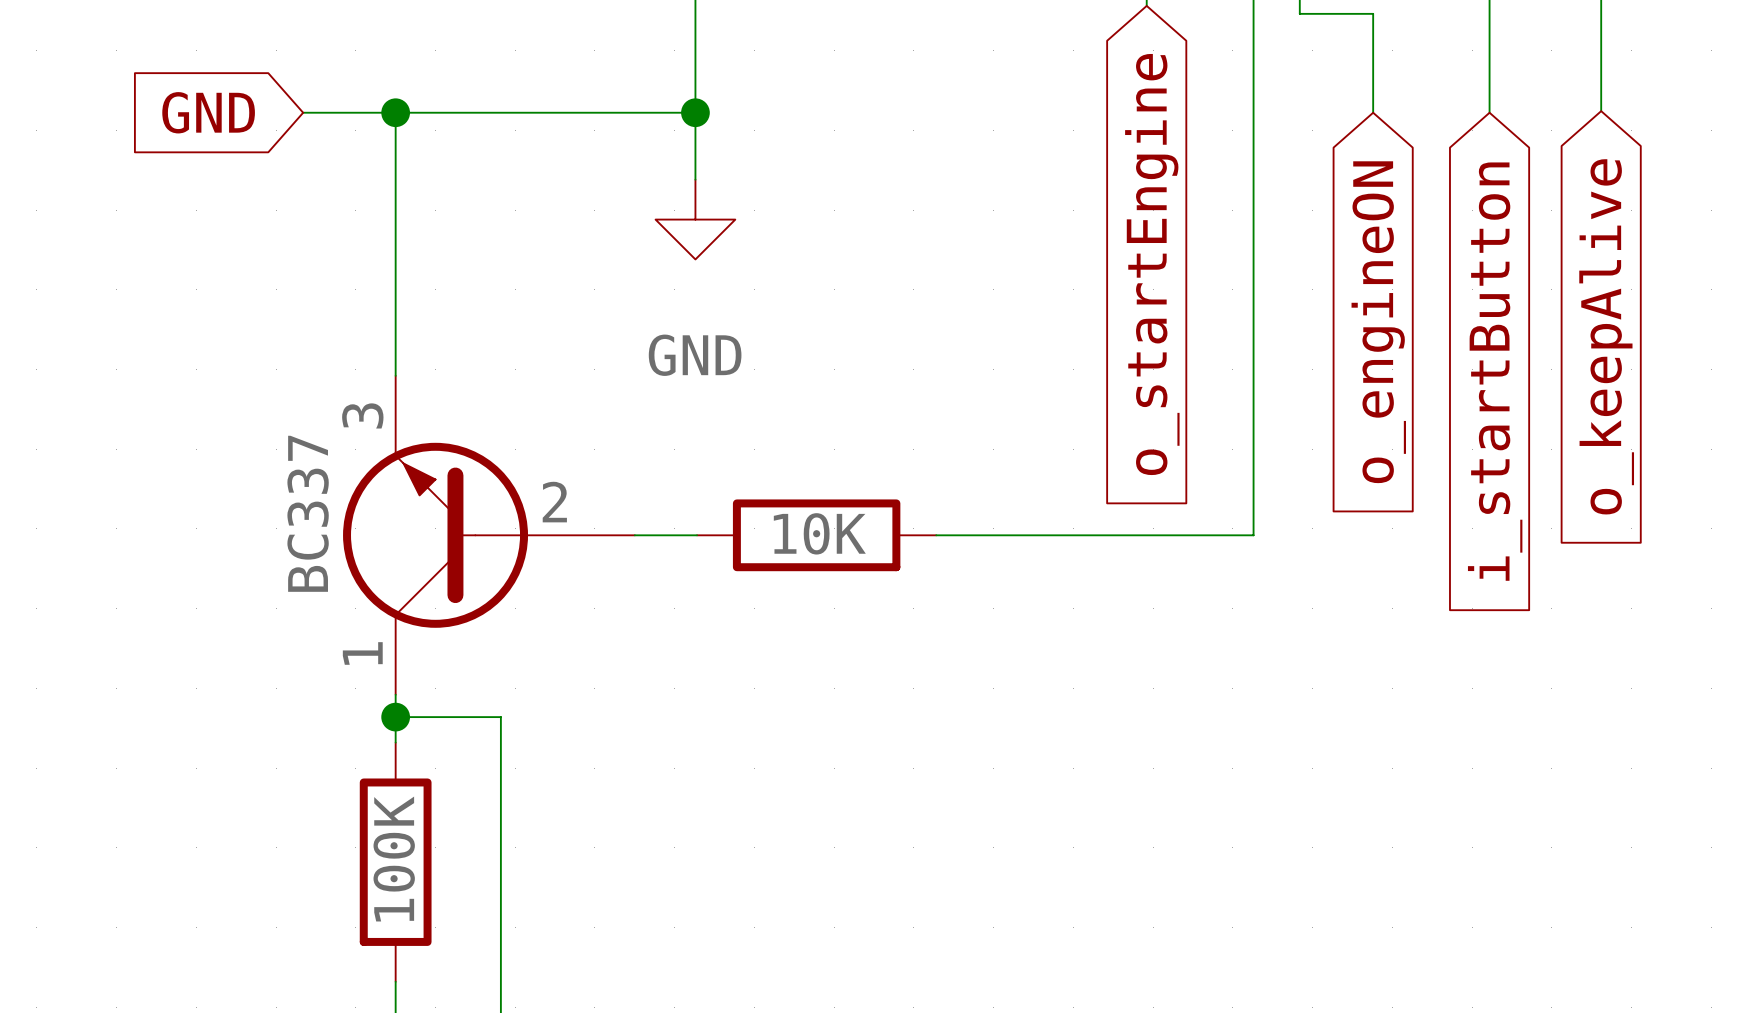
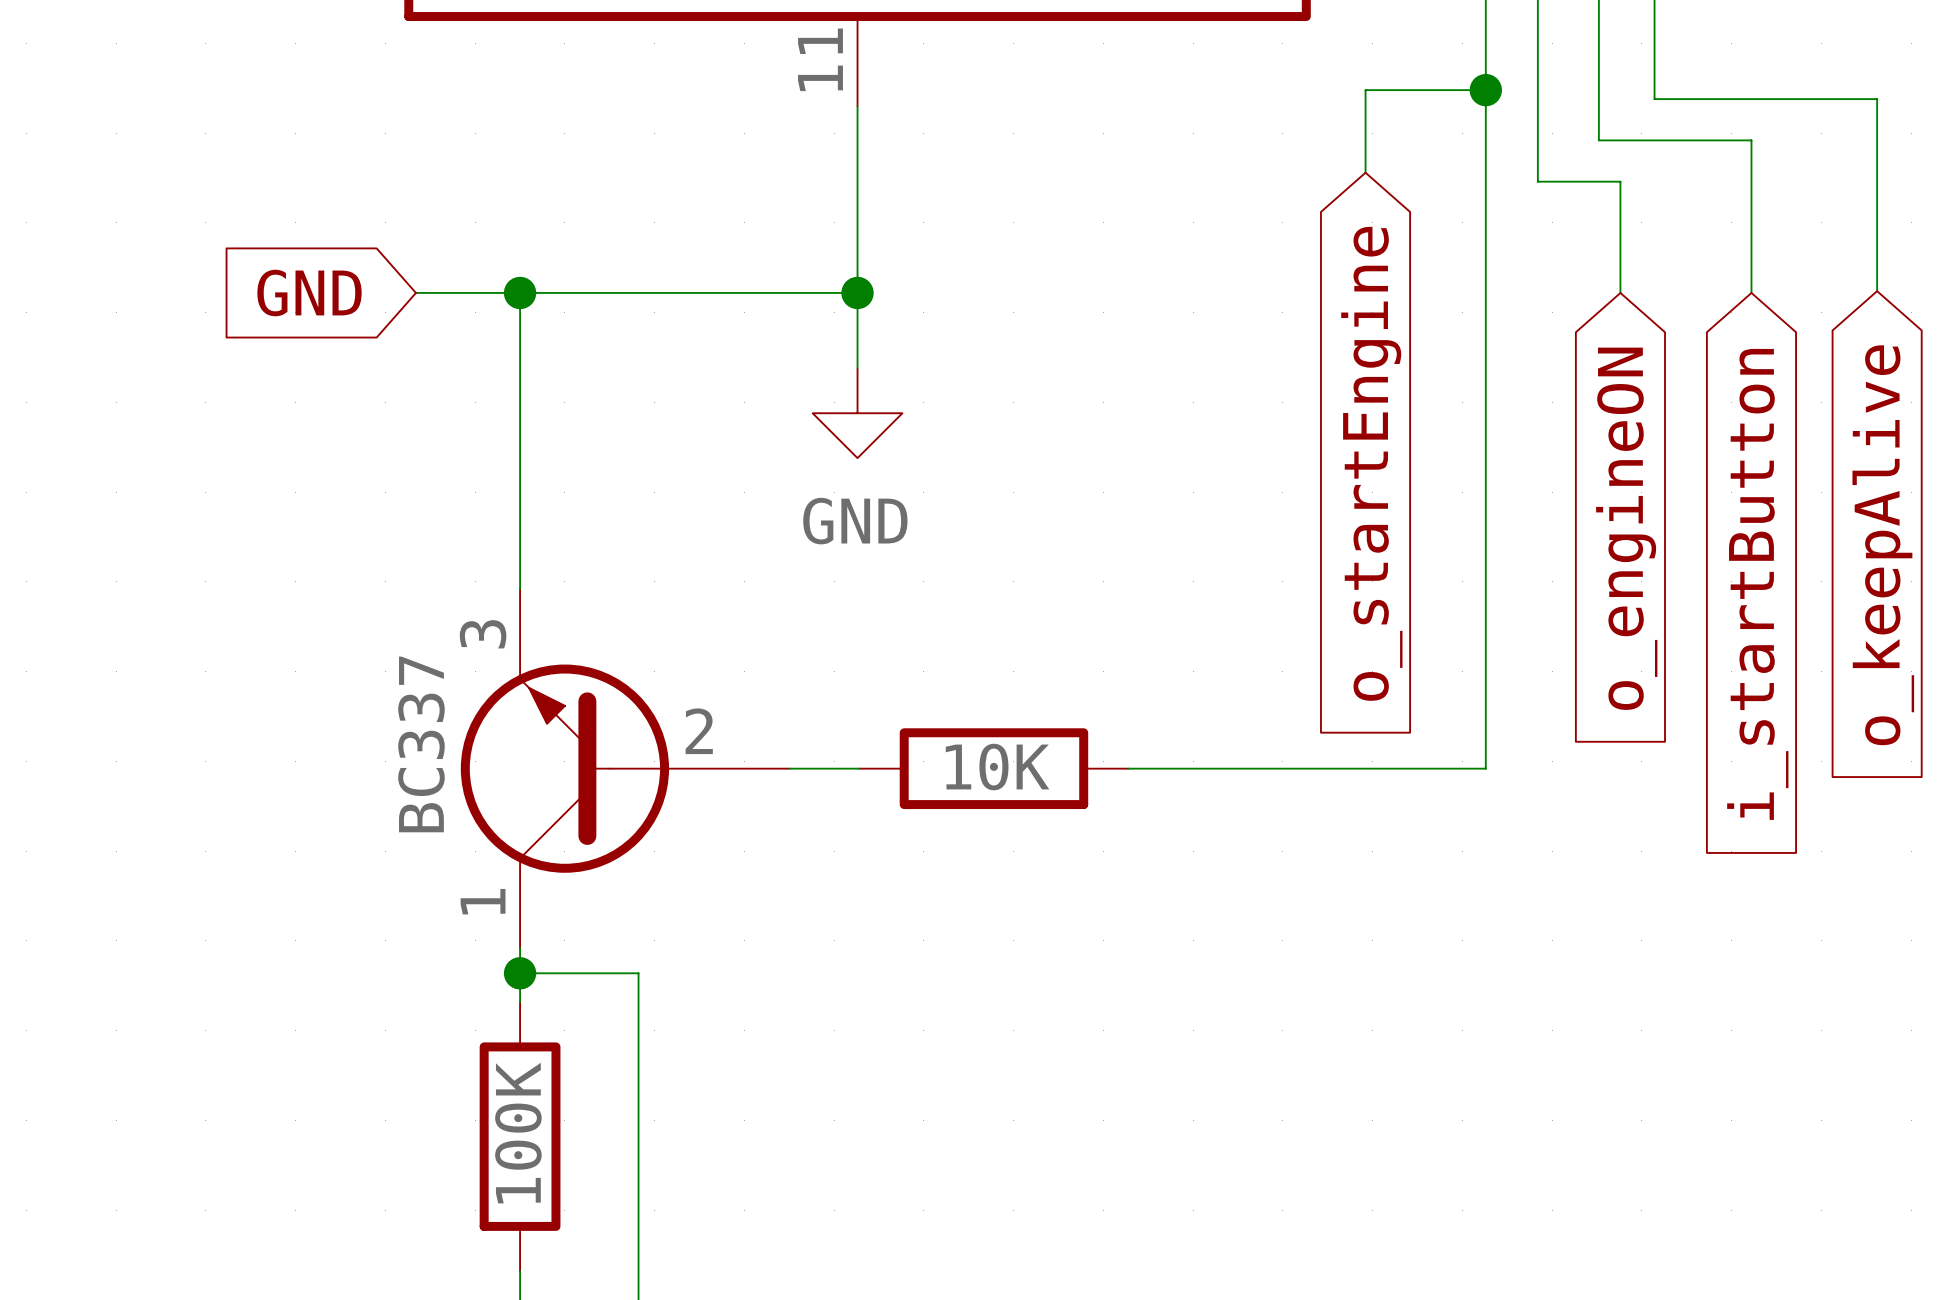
power symbol text position: GND (695, 355) -> GND (855, 521)

